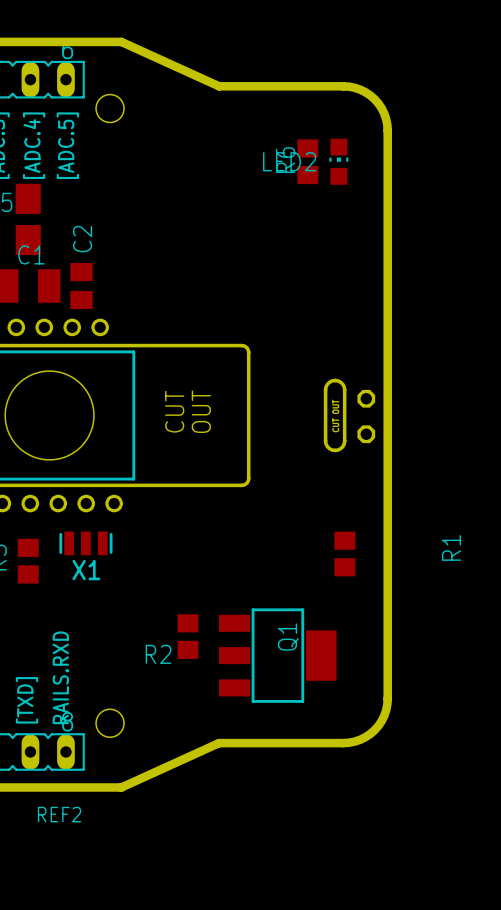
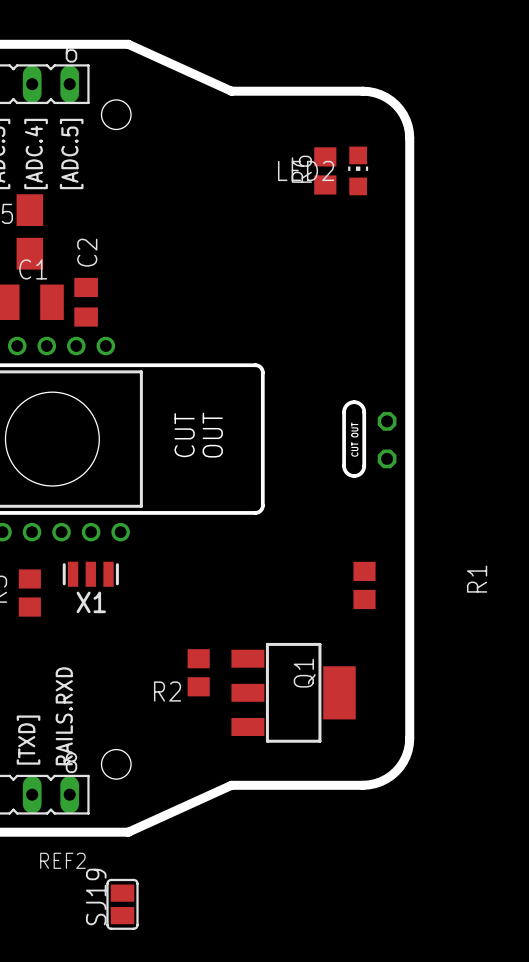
SJ19: none -> (122, 904)

